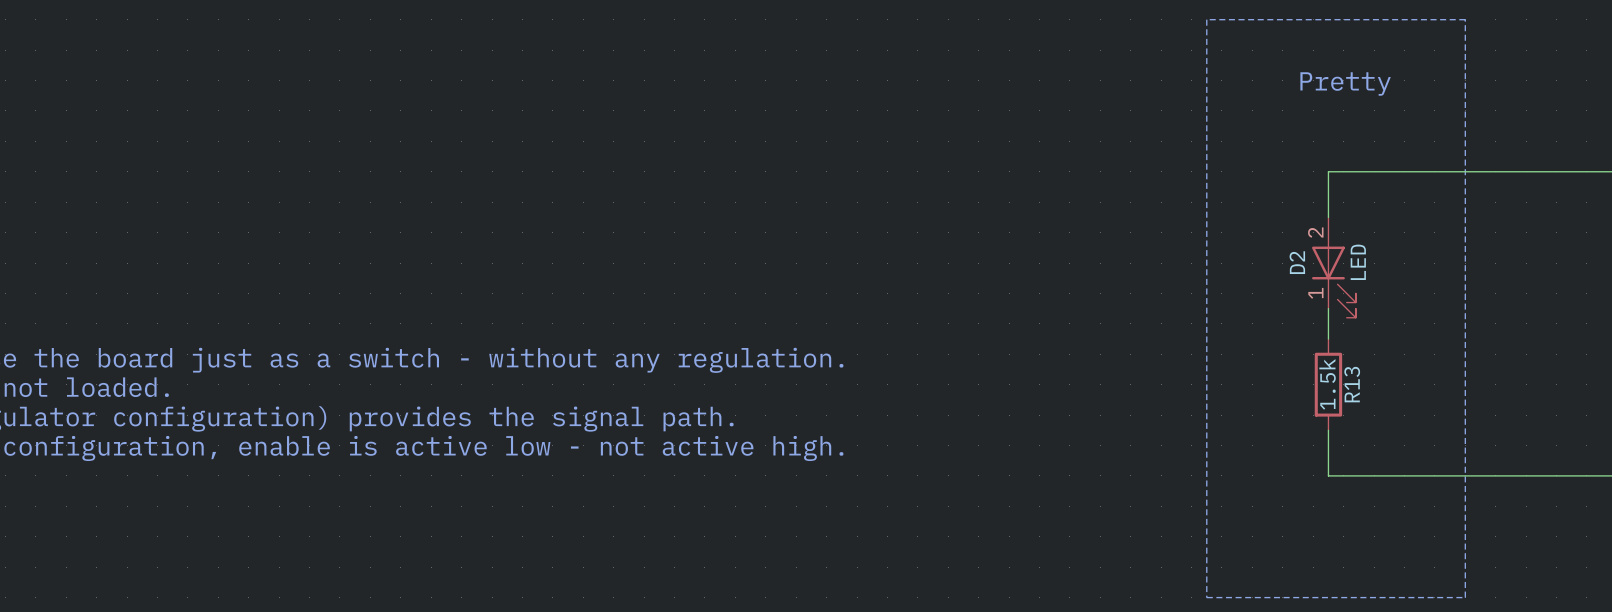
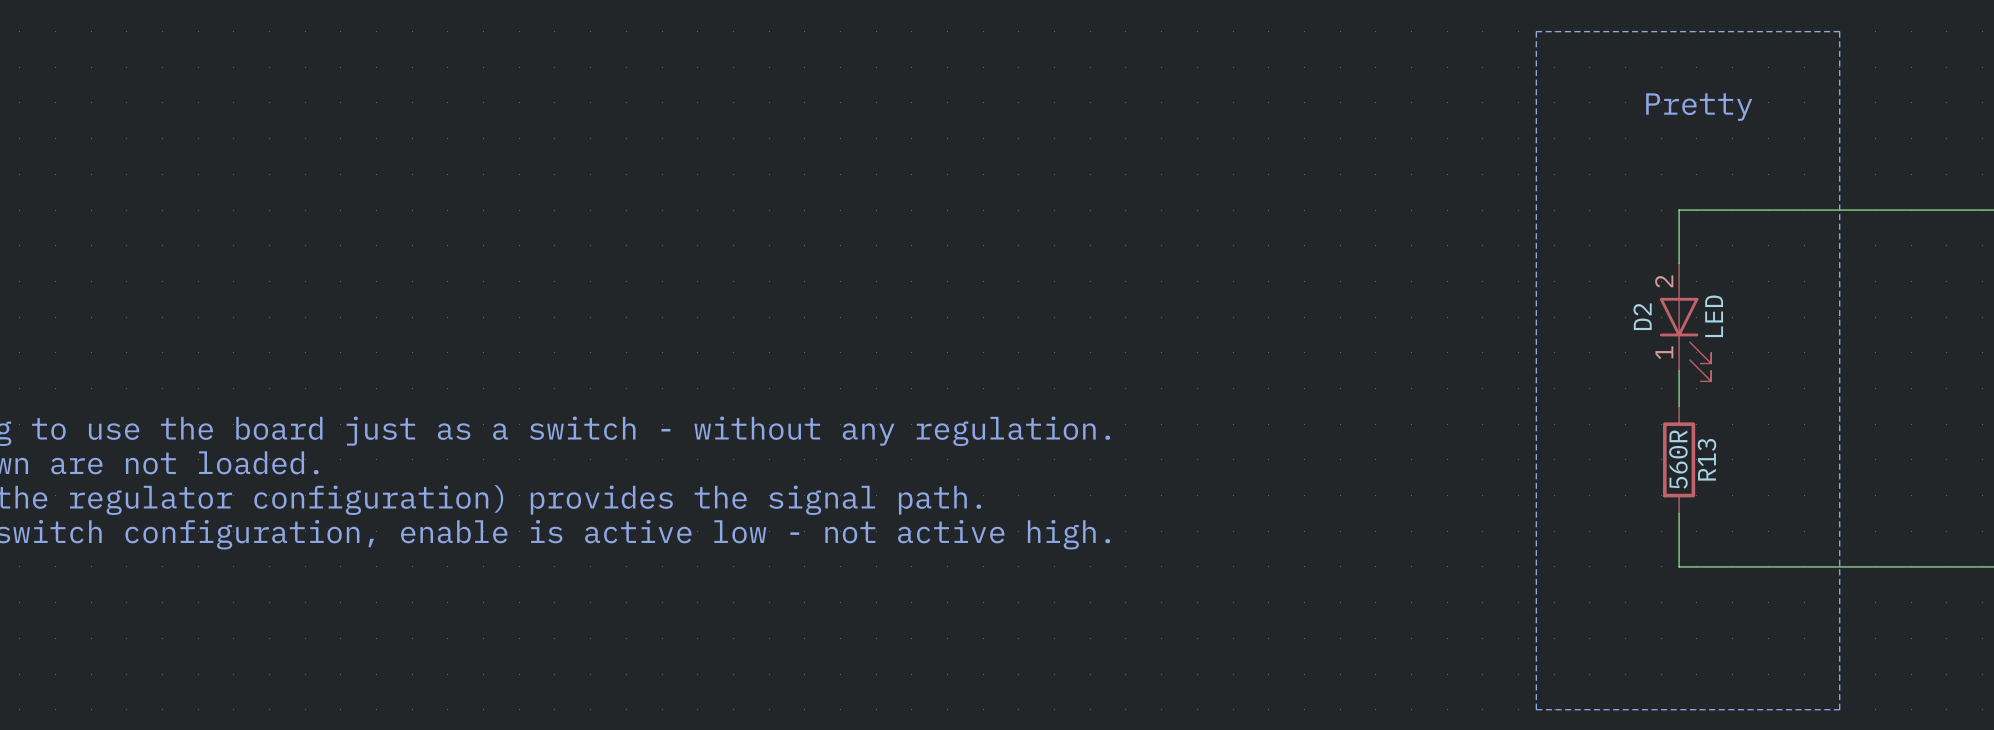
R13 value: 1.5k (1327, 384) -> 560R (1678, 459)

